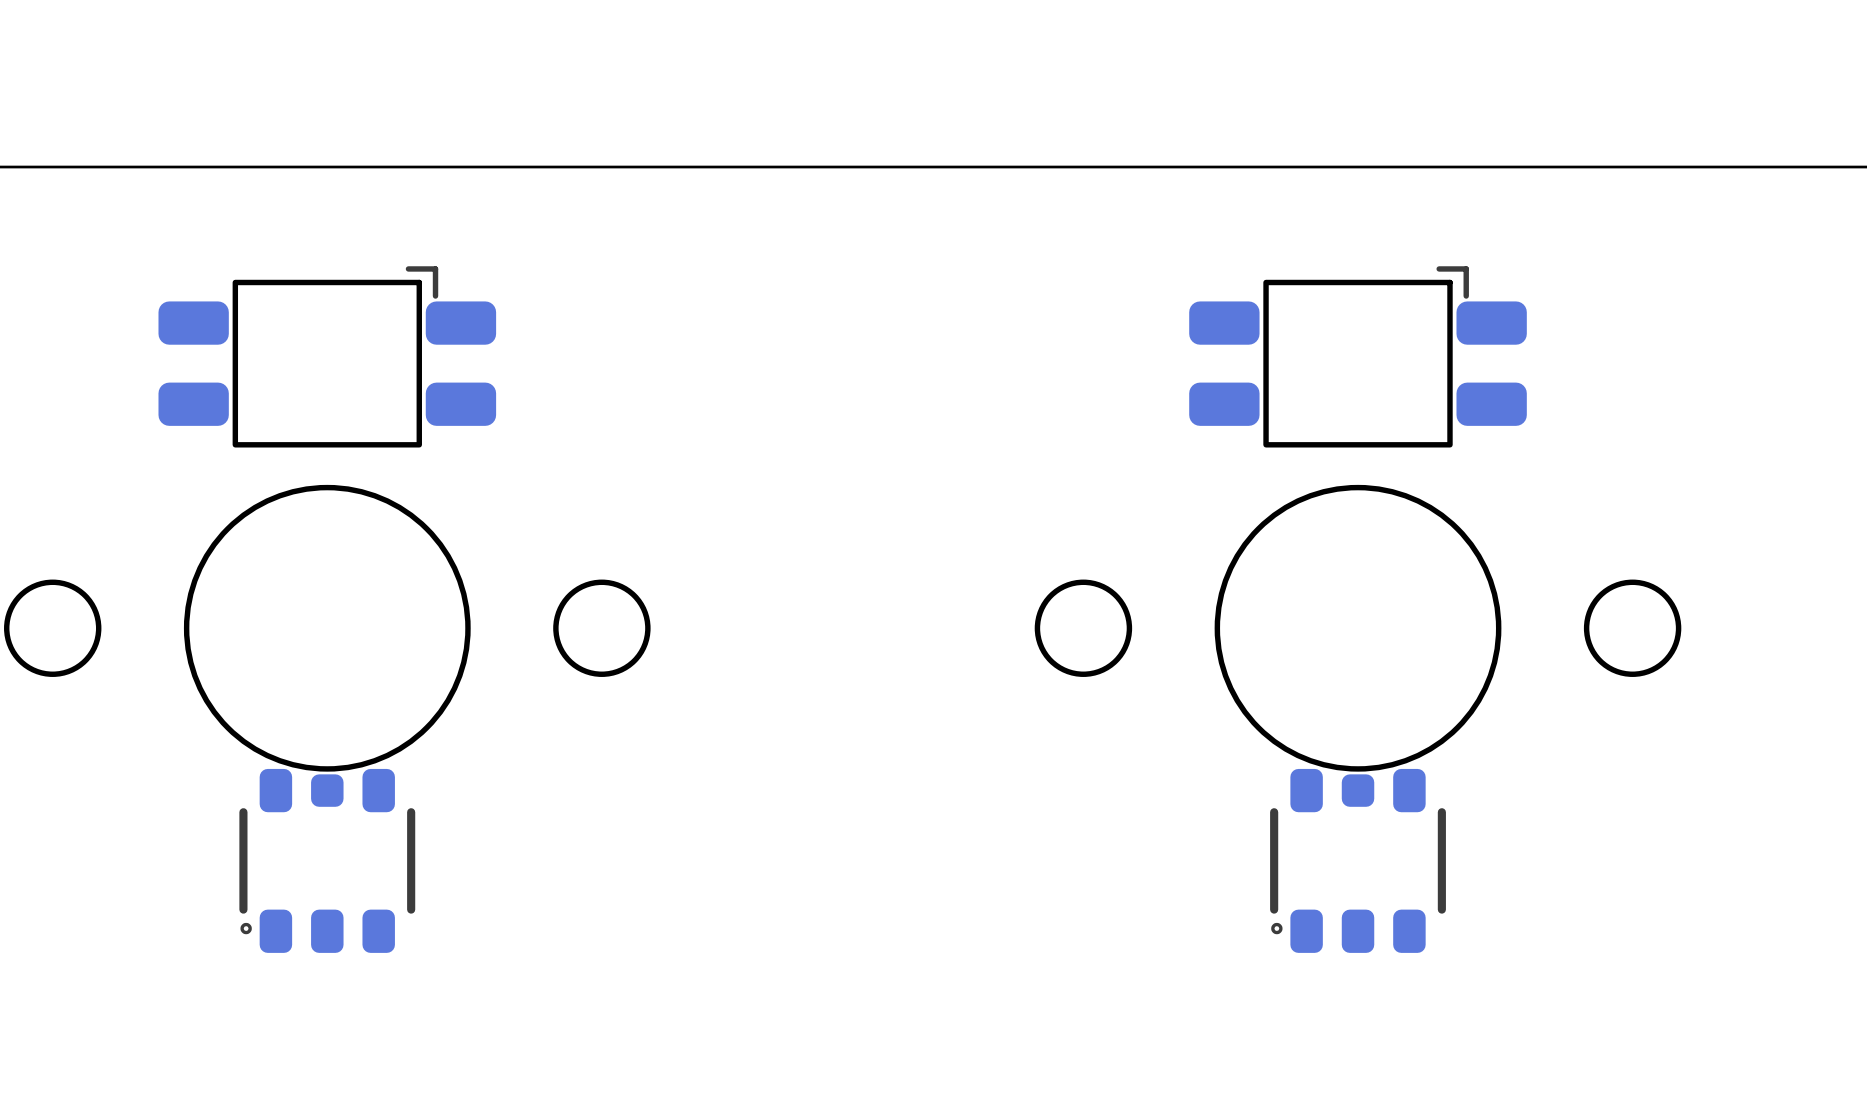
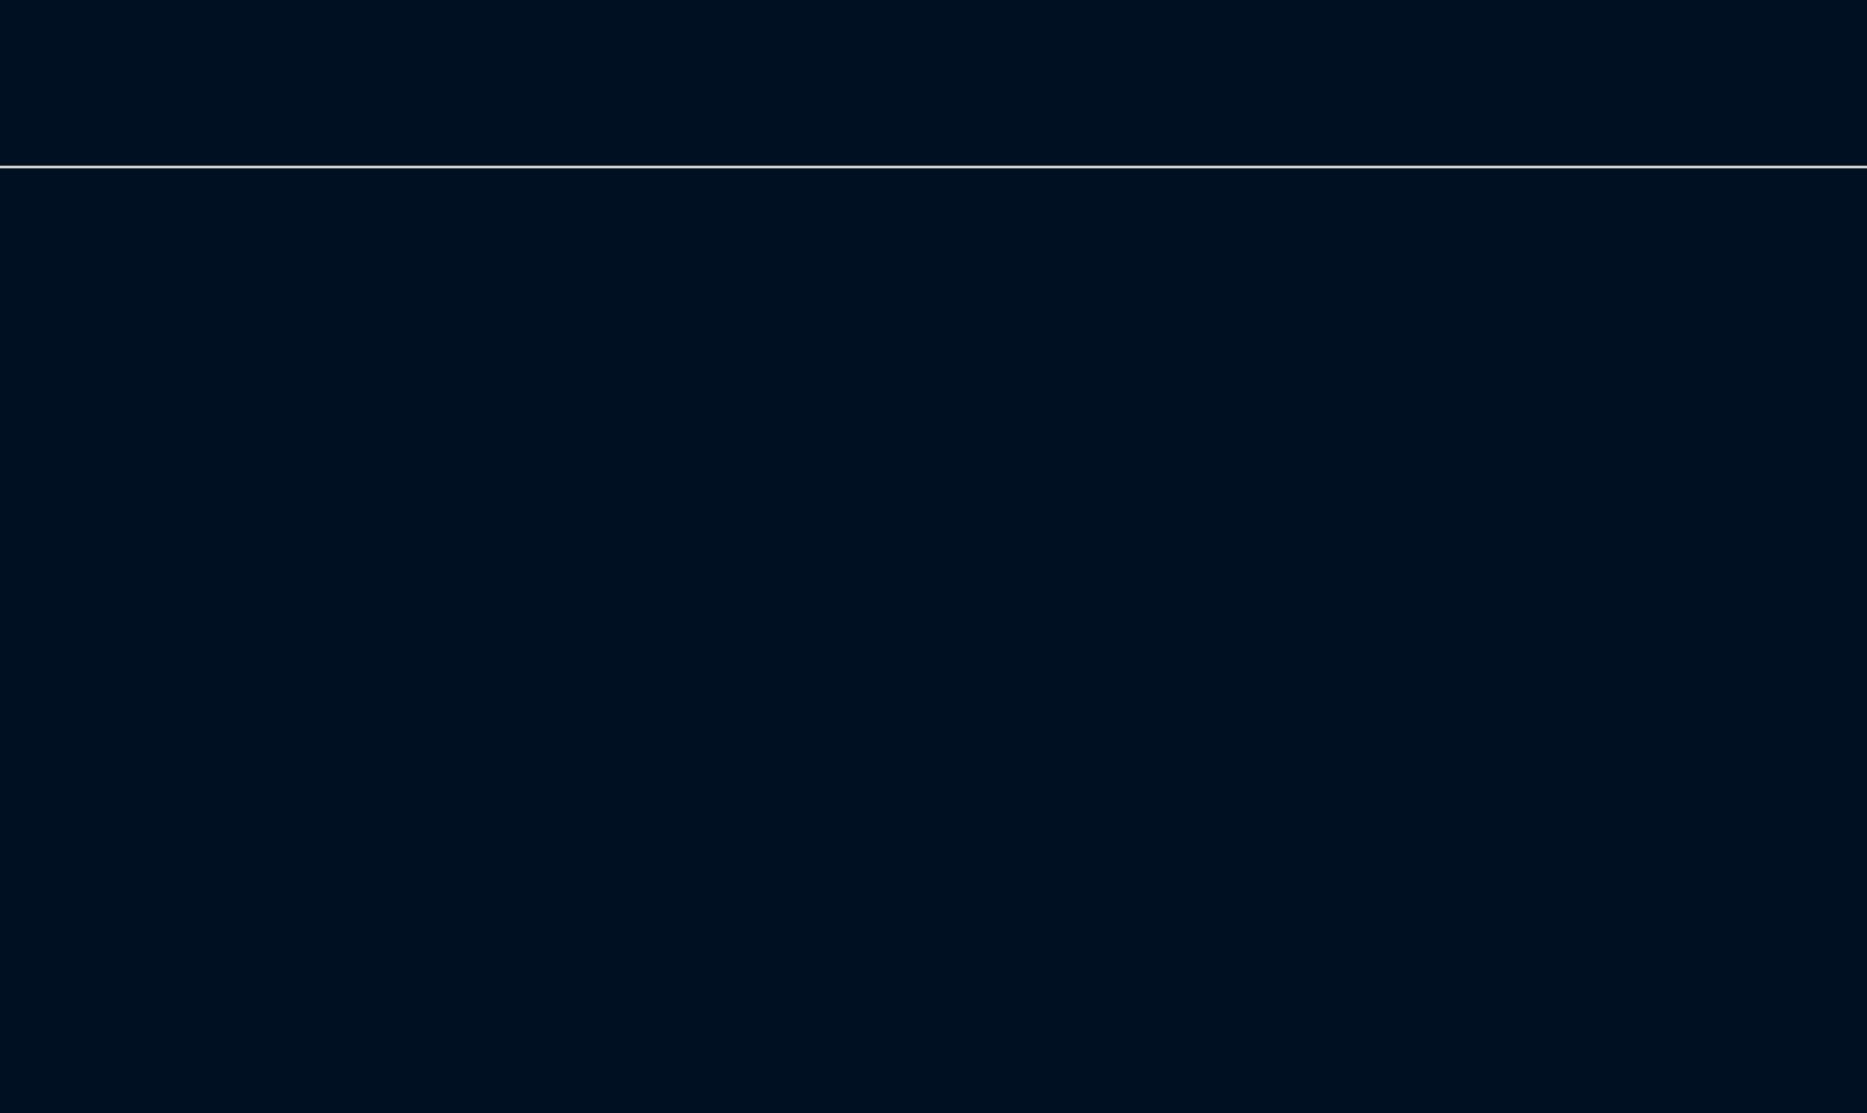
part: (327, 356) -> none
part: (1358, 356) -> none
part: (327, 718) -> none
part: (1358, 718) -> none

